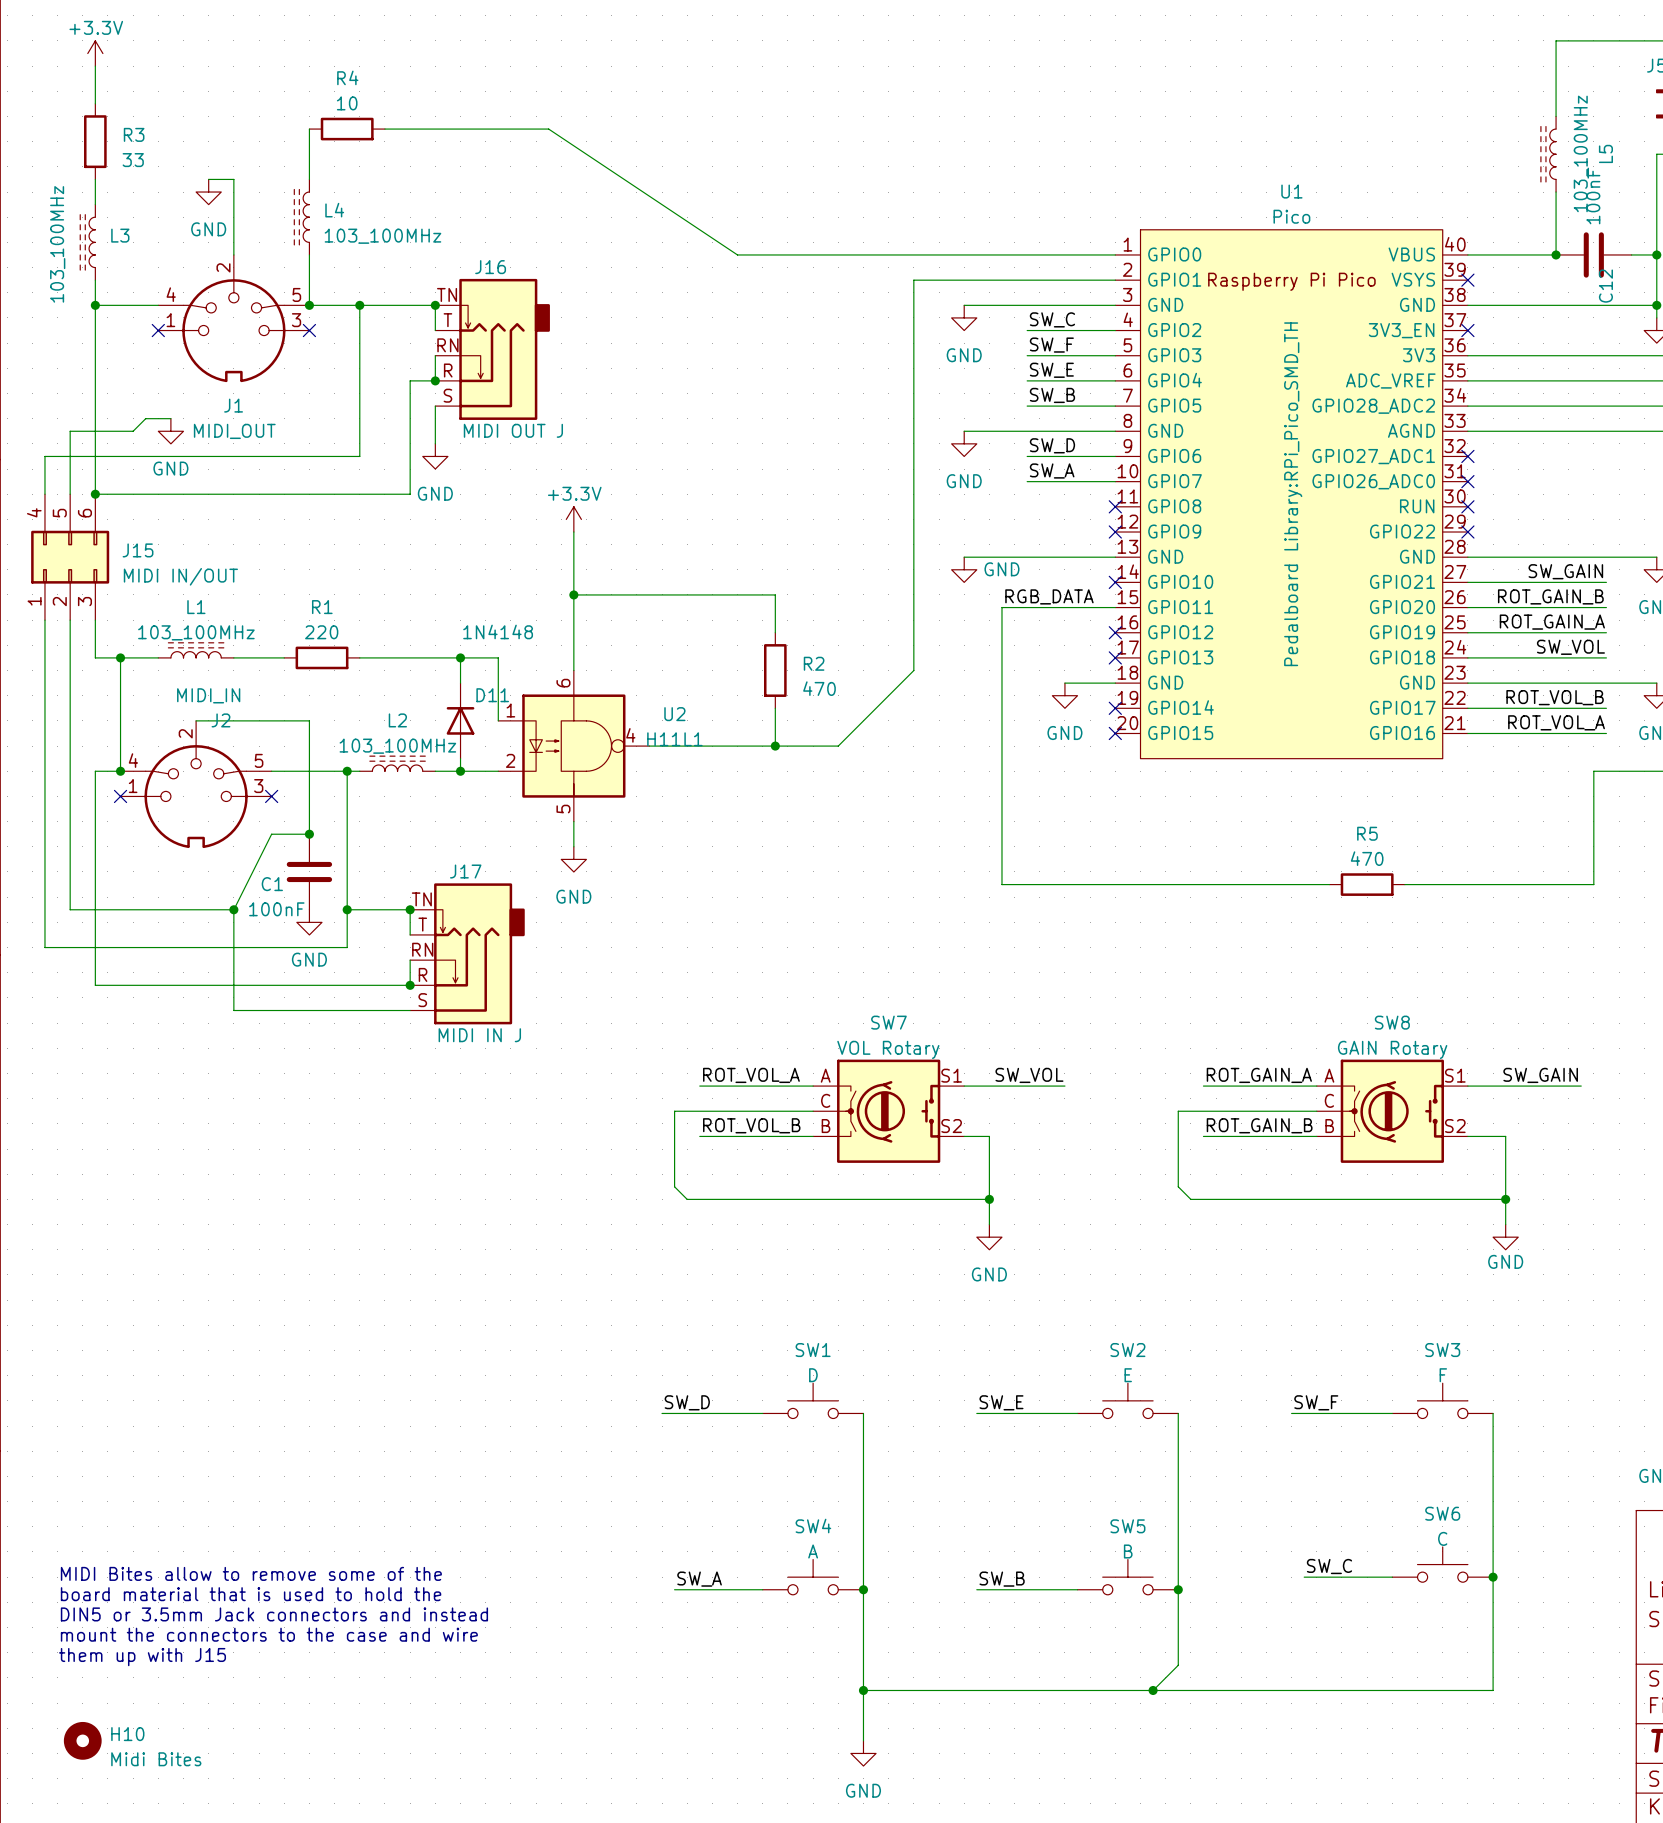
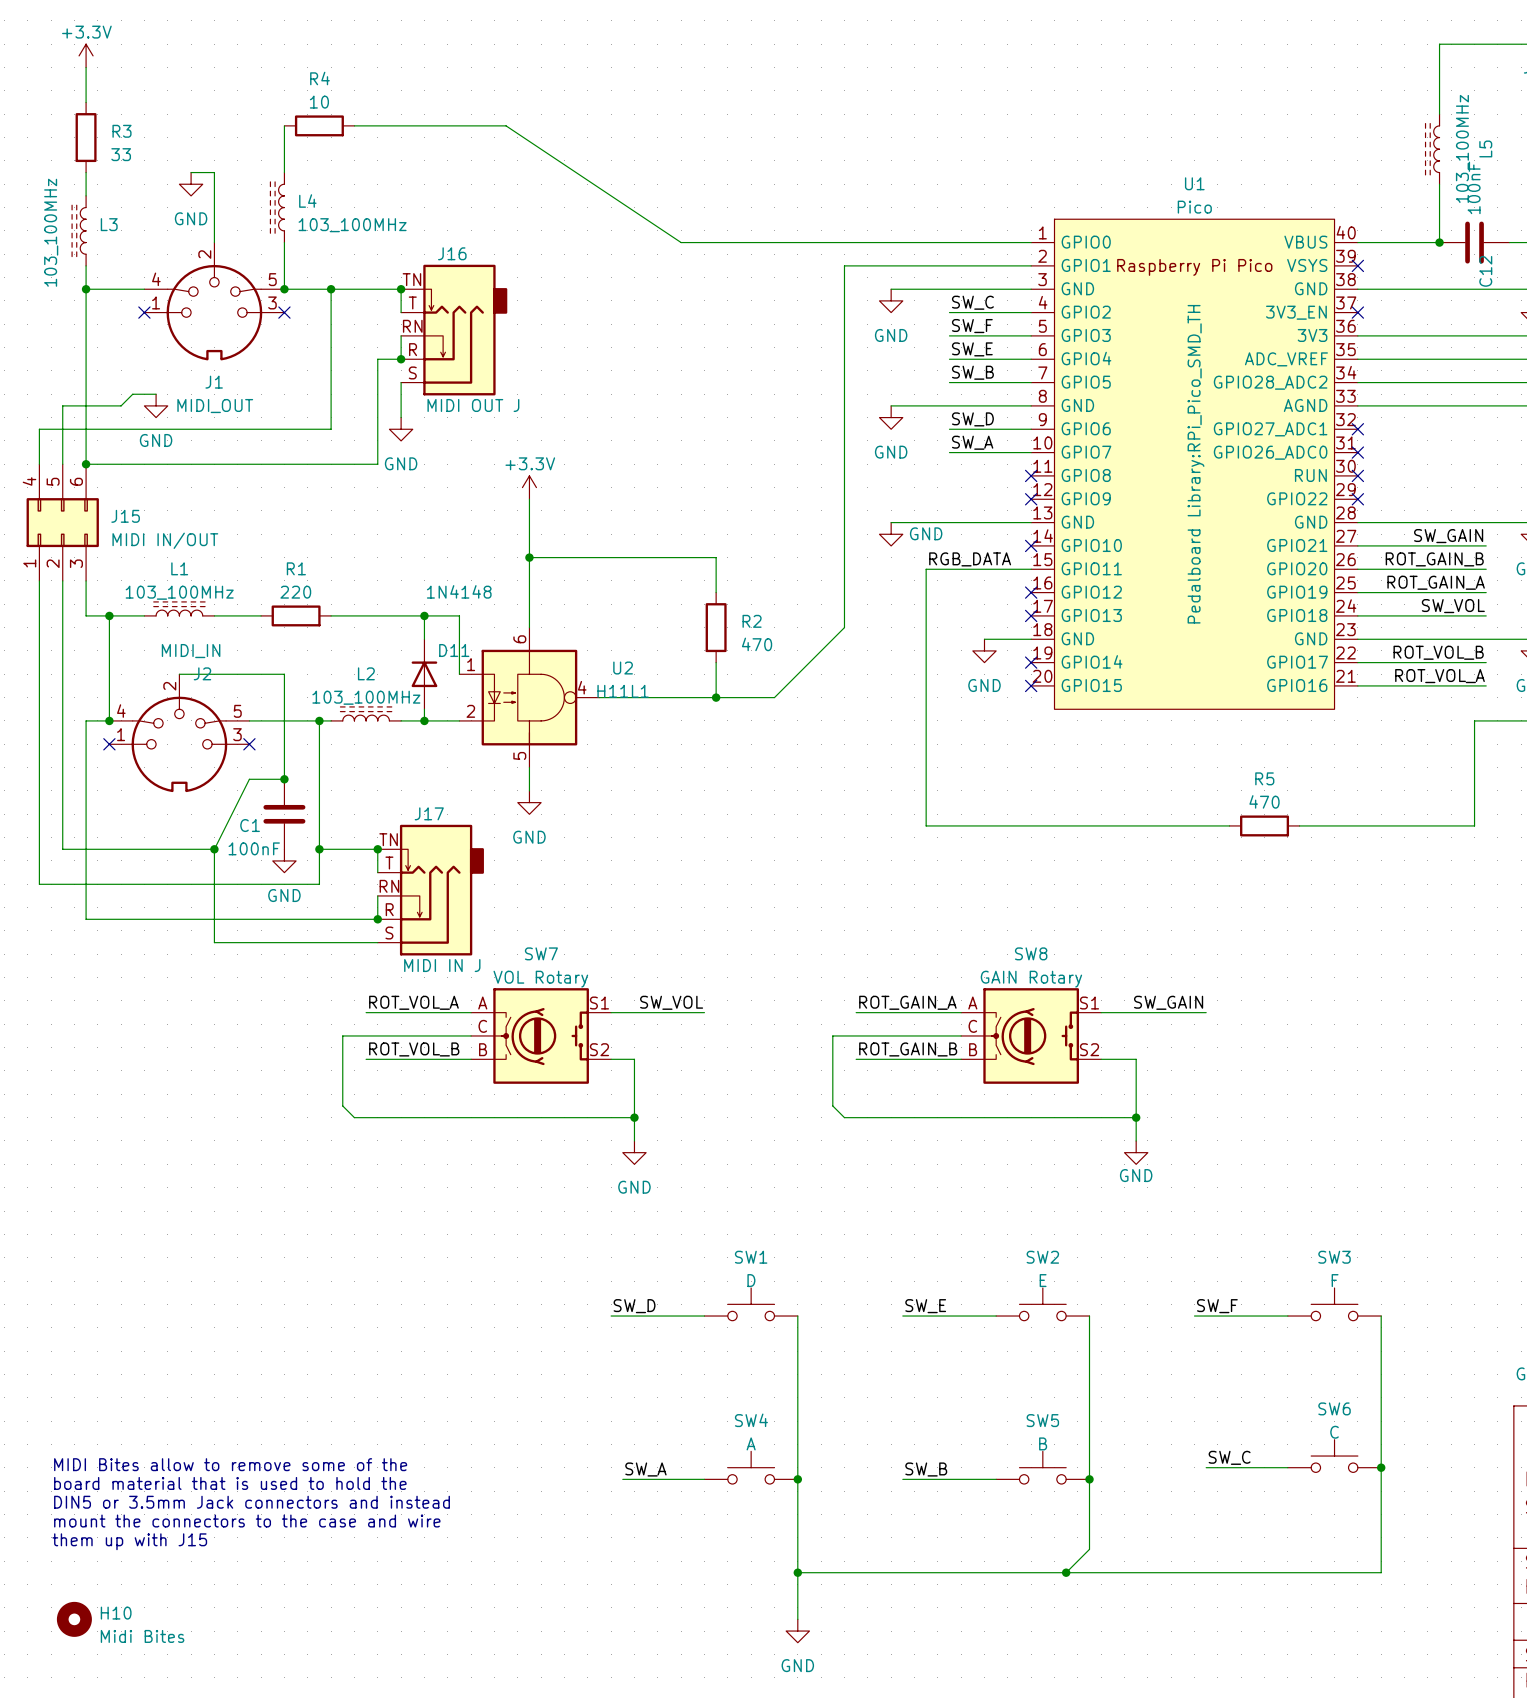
label: none -> ROT_VOL_A (413, 1002)
label: none -> SW_VOL (671, 1002)
label: ROT_VOL_A (751, 1075) -> none
label: none -> ROT_GAIN_A (907, 1002)
label: SW_VOL (1029, 1075) -> none
label: ROT_GAIN_A (1259, 1075) -> none
label: none -> SW_GAIN (1168, 1002)
label: SW_GAIN (1540, 1075) -> none
wire: none -> (366, 1012) (471, 1012)
wire: none -> (611, 1012) (646, 1012)
wire: (762, 1086) (813, 1086) -> none
wire: (1304, 1086) (1316, 1086) -> (1101, 1012) (1112, 1012)
wire: (1467, 1086) (1581, 1086) -> none
wire: none -> (471, 1035) (342, 1035) (342, 1105) (354, 1117) (634, 1117)
wire: (813, 1111) (674, 1111) (674, 1186) (687, 1199) (913, 1199) -> (961, 1035) (832, 1035) (832, 1105) (844, 1117)
SW7 position: (888, 1111) -> (541, 1035)
wire: (1316, 1111) (1178, 1111) (1178, 1186) (1190, 1199) -> (914, 1117) (1101, 1117)
SW8 position: (1392, 1111) -> (1031, 1035)
label: none -> ROT_VOL_B (414, 1049)
label: ROT_VOL_B (751, 1125) -> none
label: none -> ROT_GAIN_B (908, 1049)
label: ROT_GAIN_B (1259, 1125) -> none
wire: none -> (366, 1059) (471, 1059)
wire: none -> (611, 1059) (634, 1059) (634, 1140)
wire: (699, 1136) (813, 1136) -> none
wire: (989, 1136) (989, 1224) -> (914, 1059) (961, 1059)
wire: none -> (1101, 1059) (1112, 1059)
wire: (1228, 1136) (1316, 1136) -> (1136, 1059) (1136, 1140)
wire: (1467, 1136) (1505, 1136) (1505, 1224) -> none
junction: none -> (634, 1117)
junction: (989, 1199) -> none
wire: (1228, 1199) (1505, 1199) -> none
junction: none -> (1136, 1117)
junction: (1505, 1199) -> none
power symbol: none -> GND (634, 1152)
power symbol: GND (989, 1237) -> none
power symbol: none -> GND (1136, 1152)
power symbol: GND (1505, 1237) -> none

